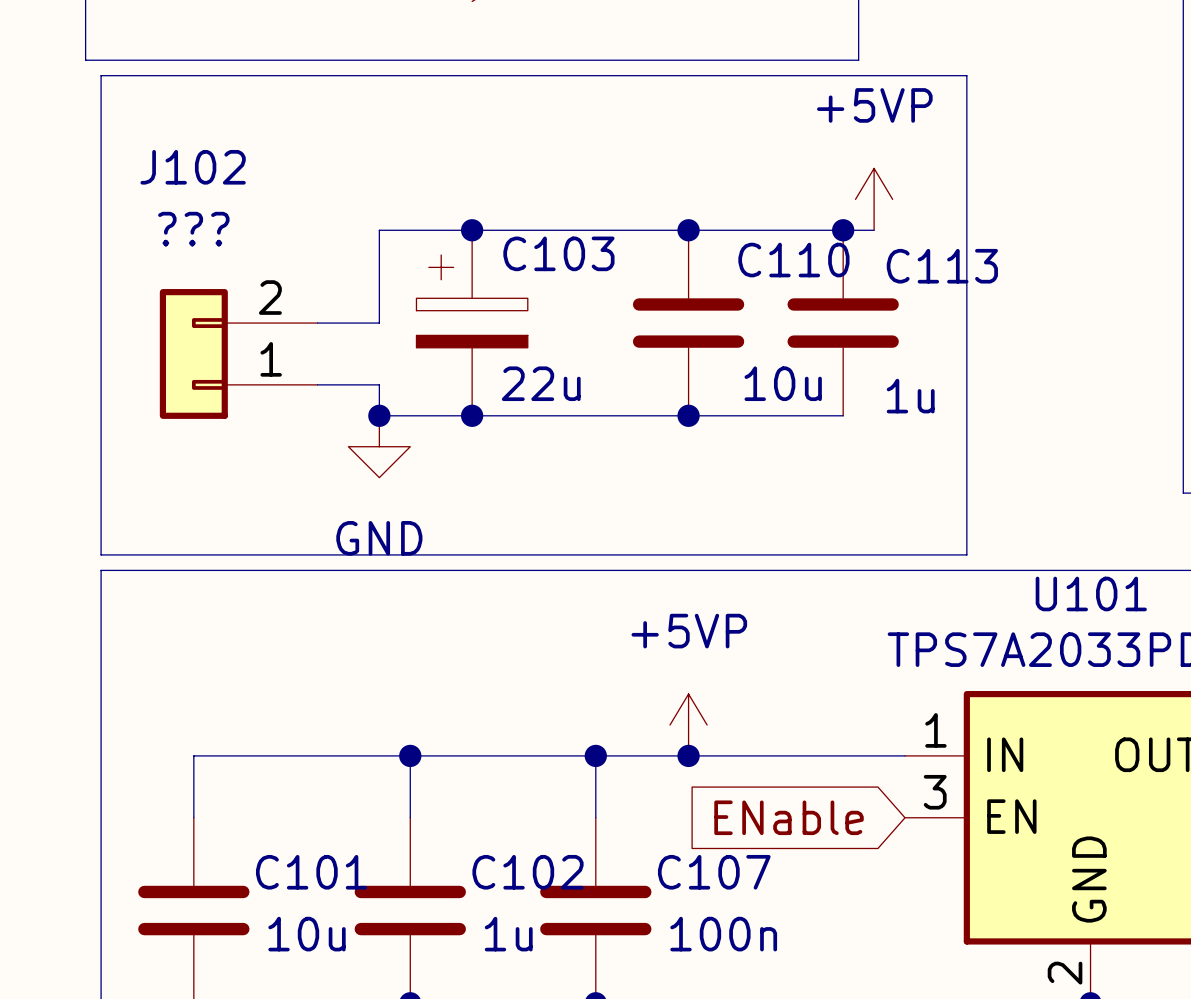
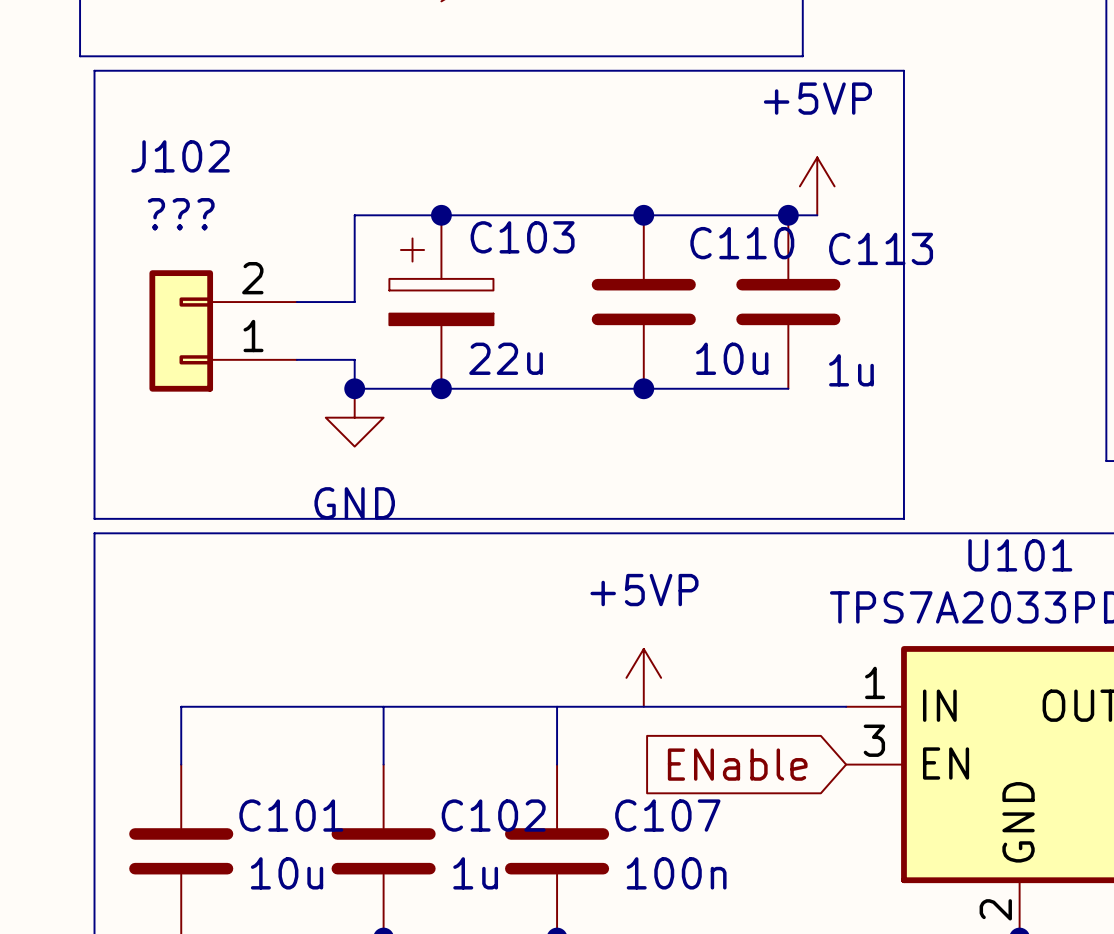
junction: (410, 755) -> none
junction: (595, 755) -> none
junction: (688, 755) -> none

